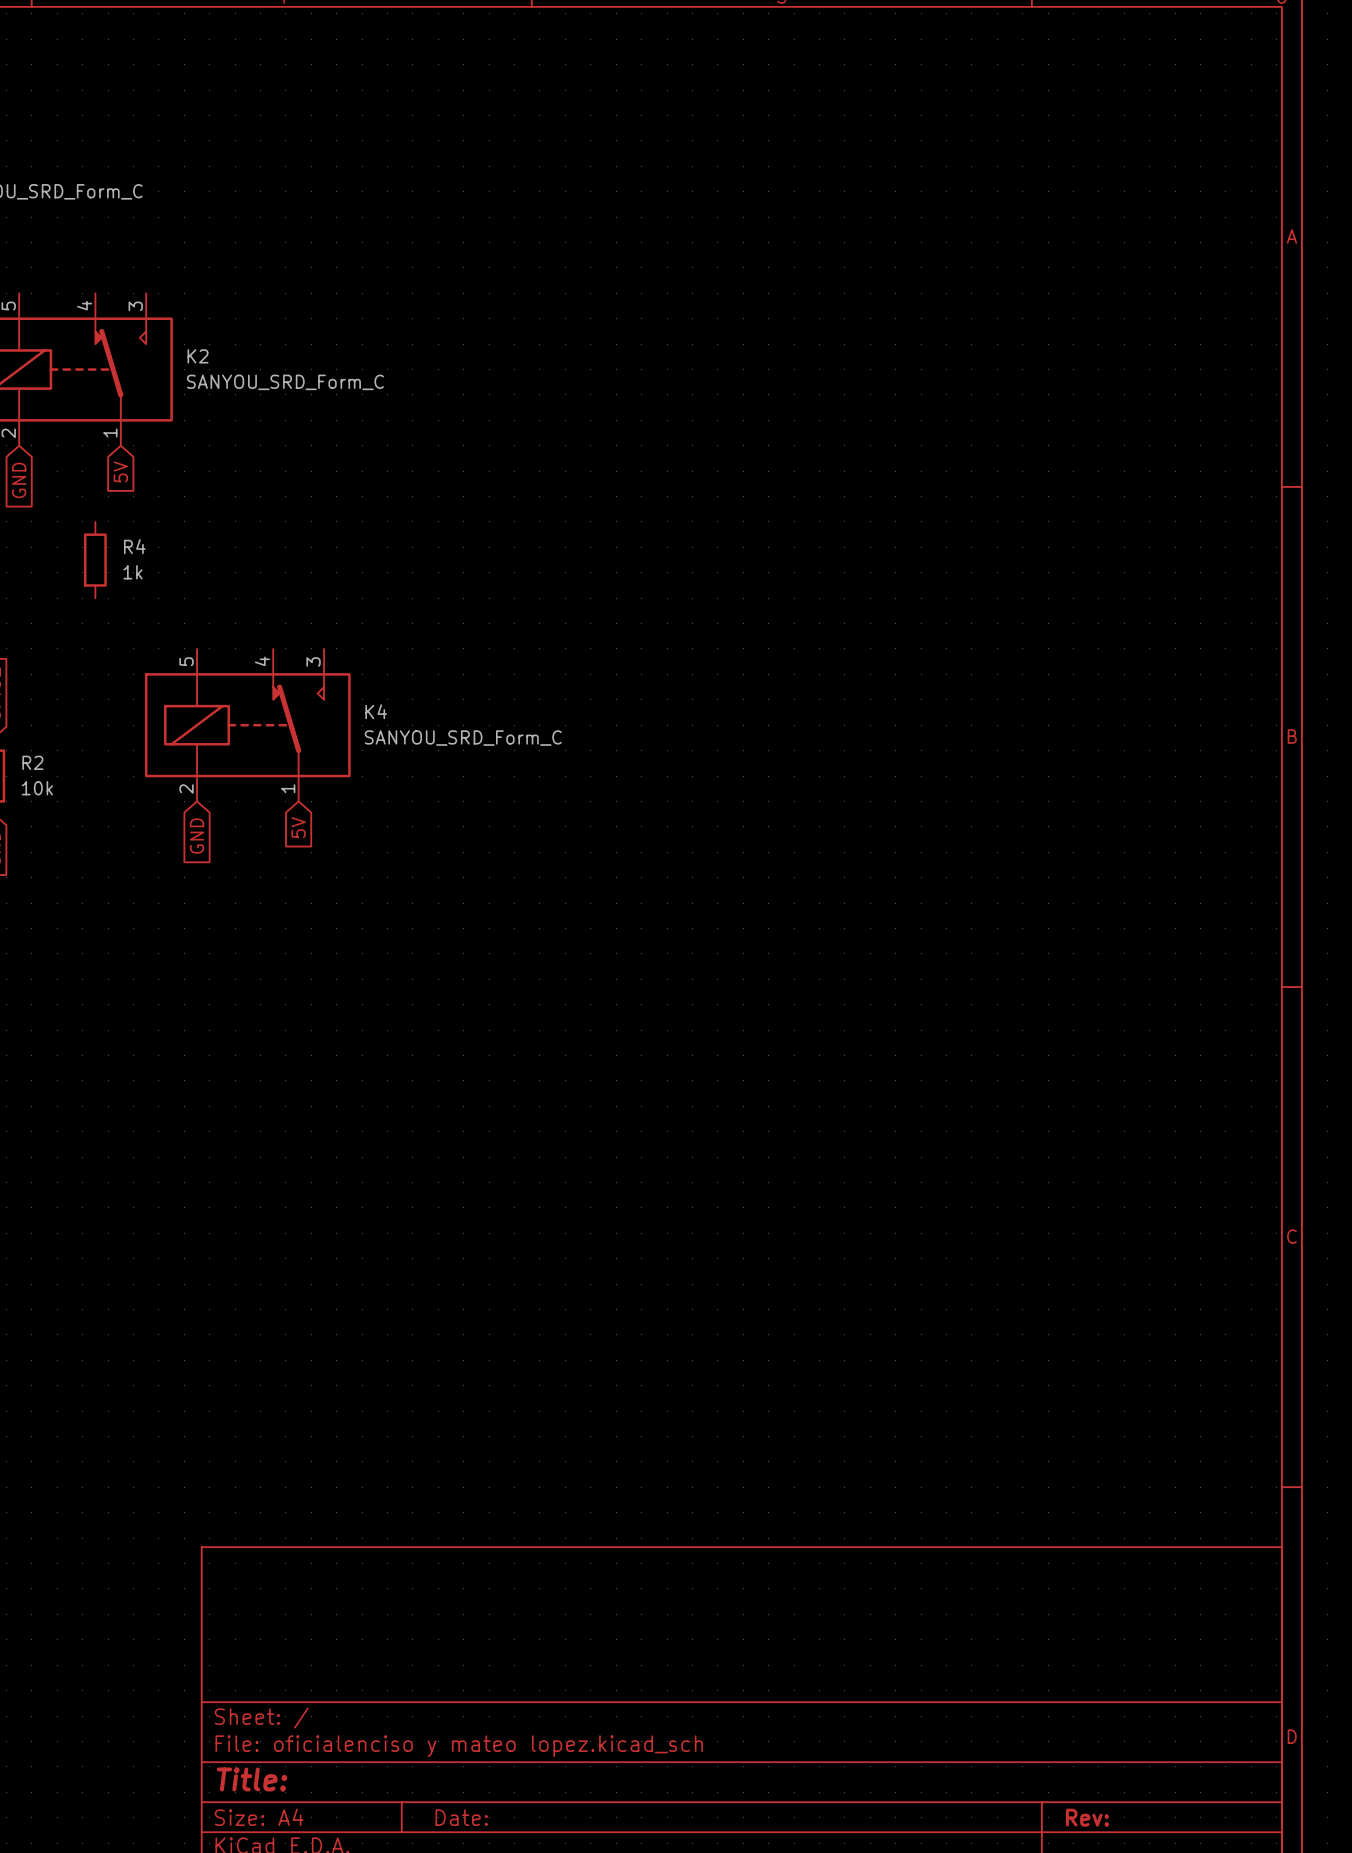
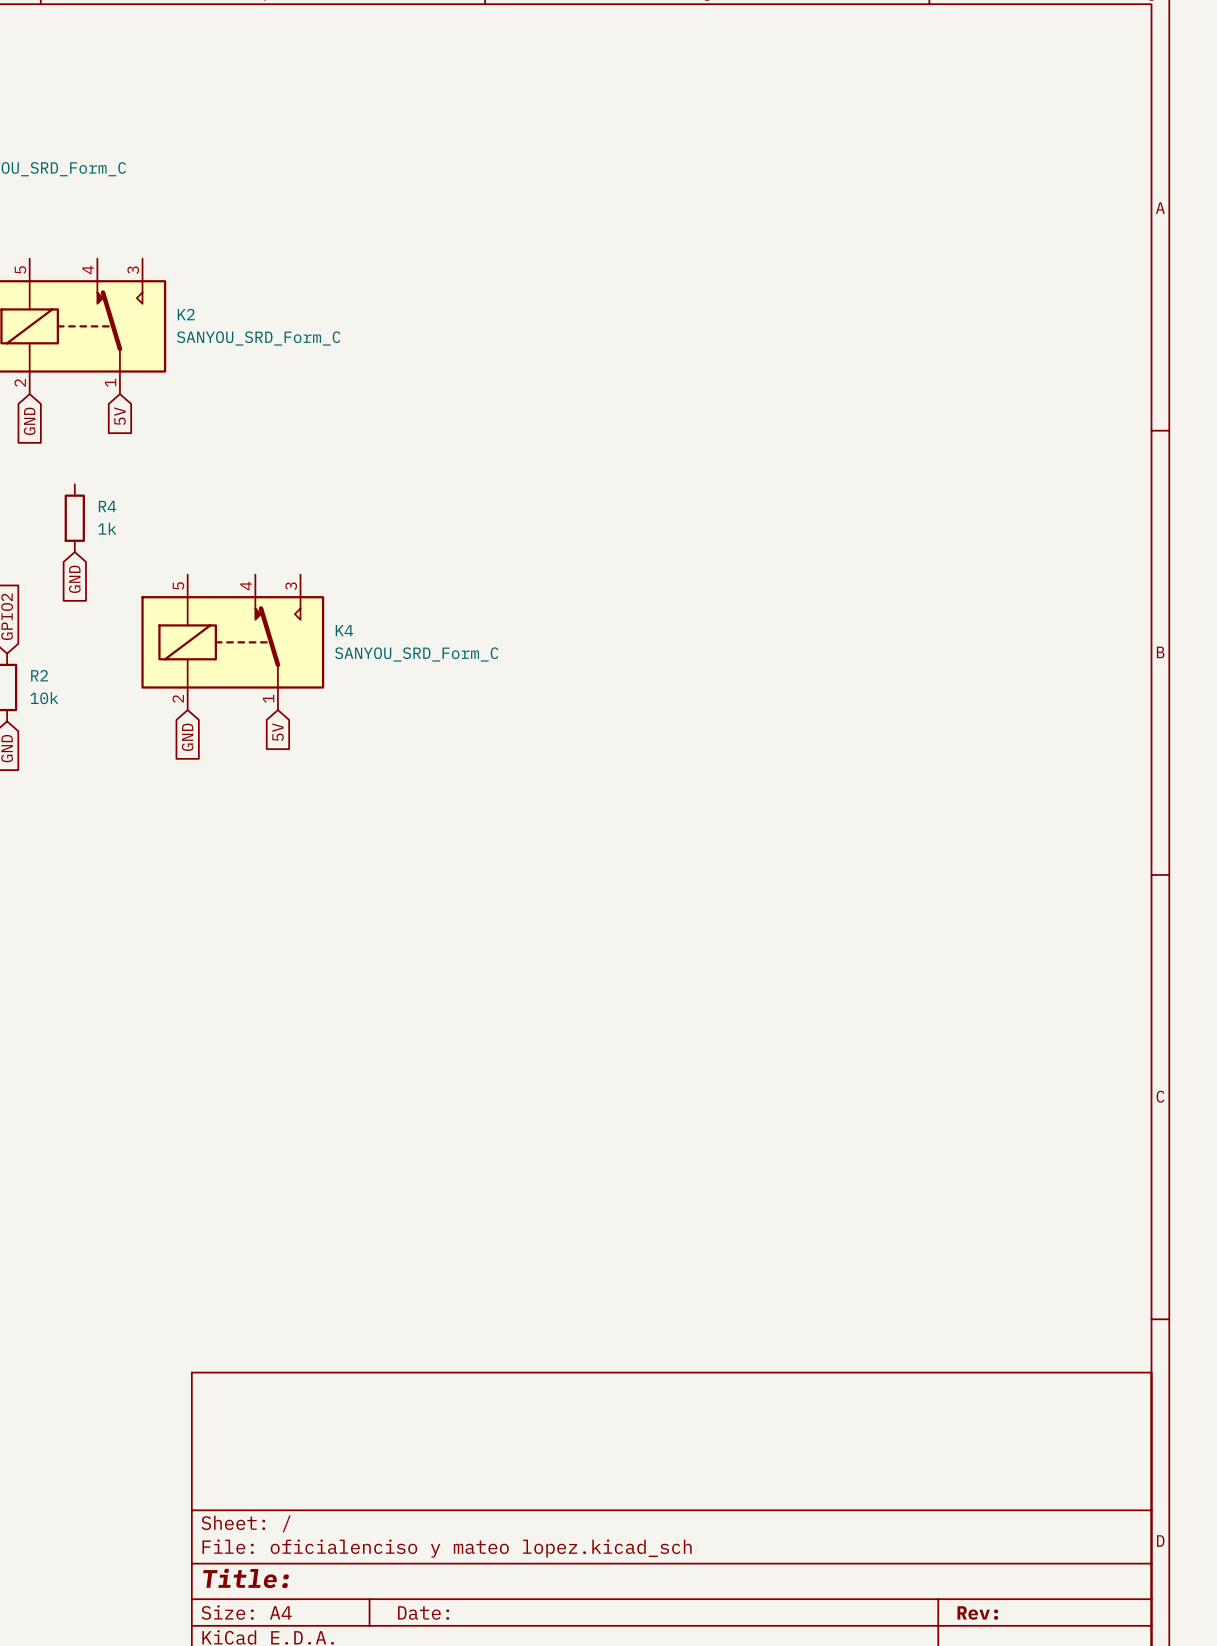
R4 position: (95, 560) -> (74, 518)
global label: none -> GND (74, 579)

